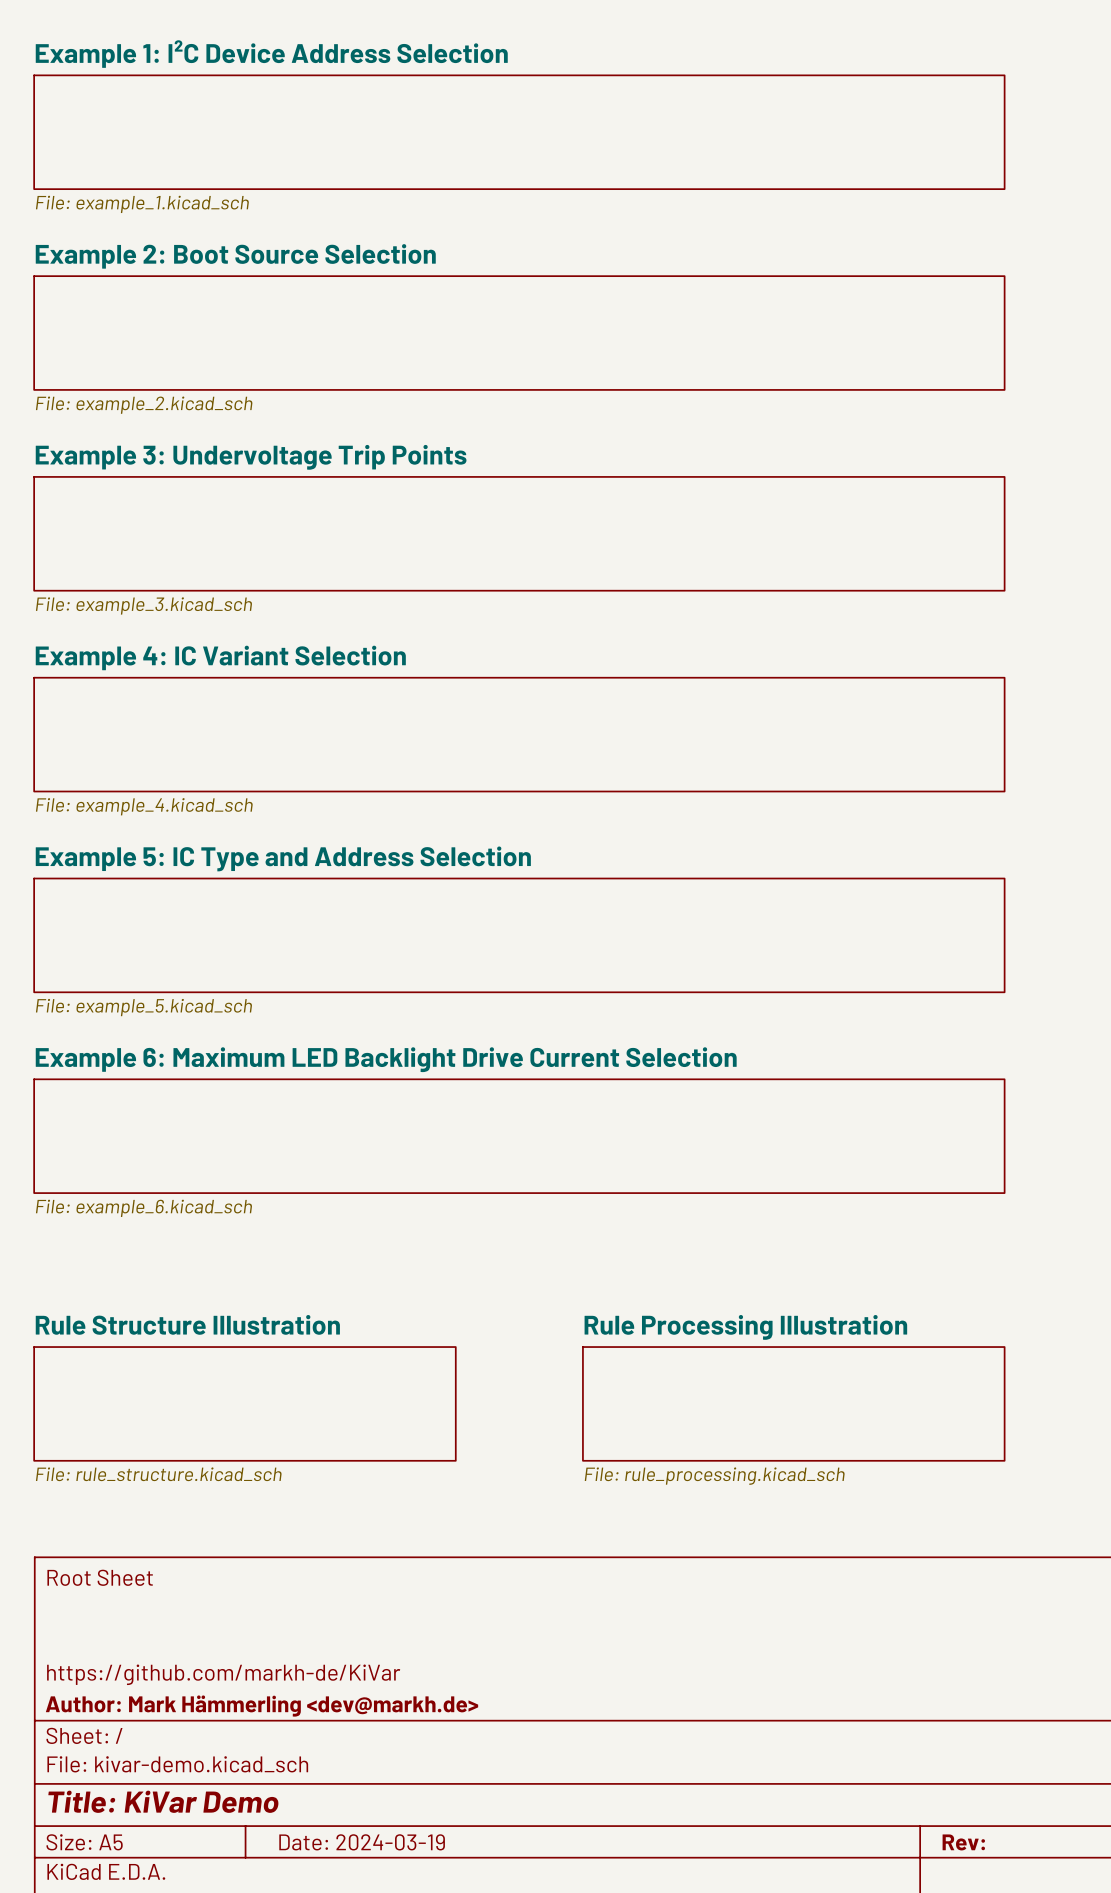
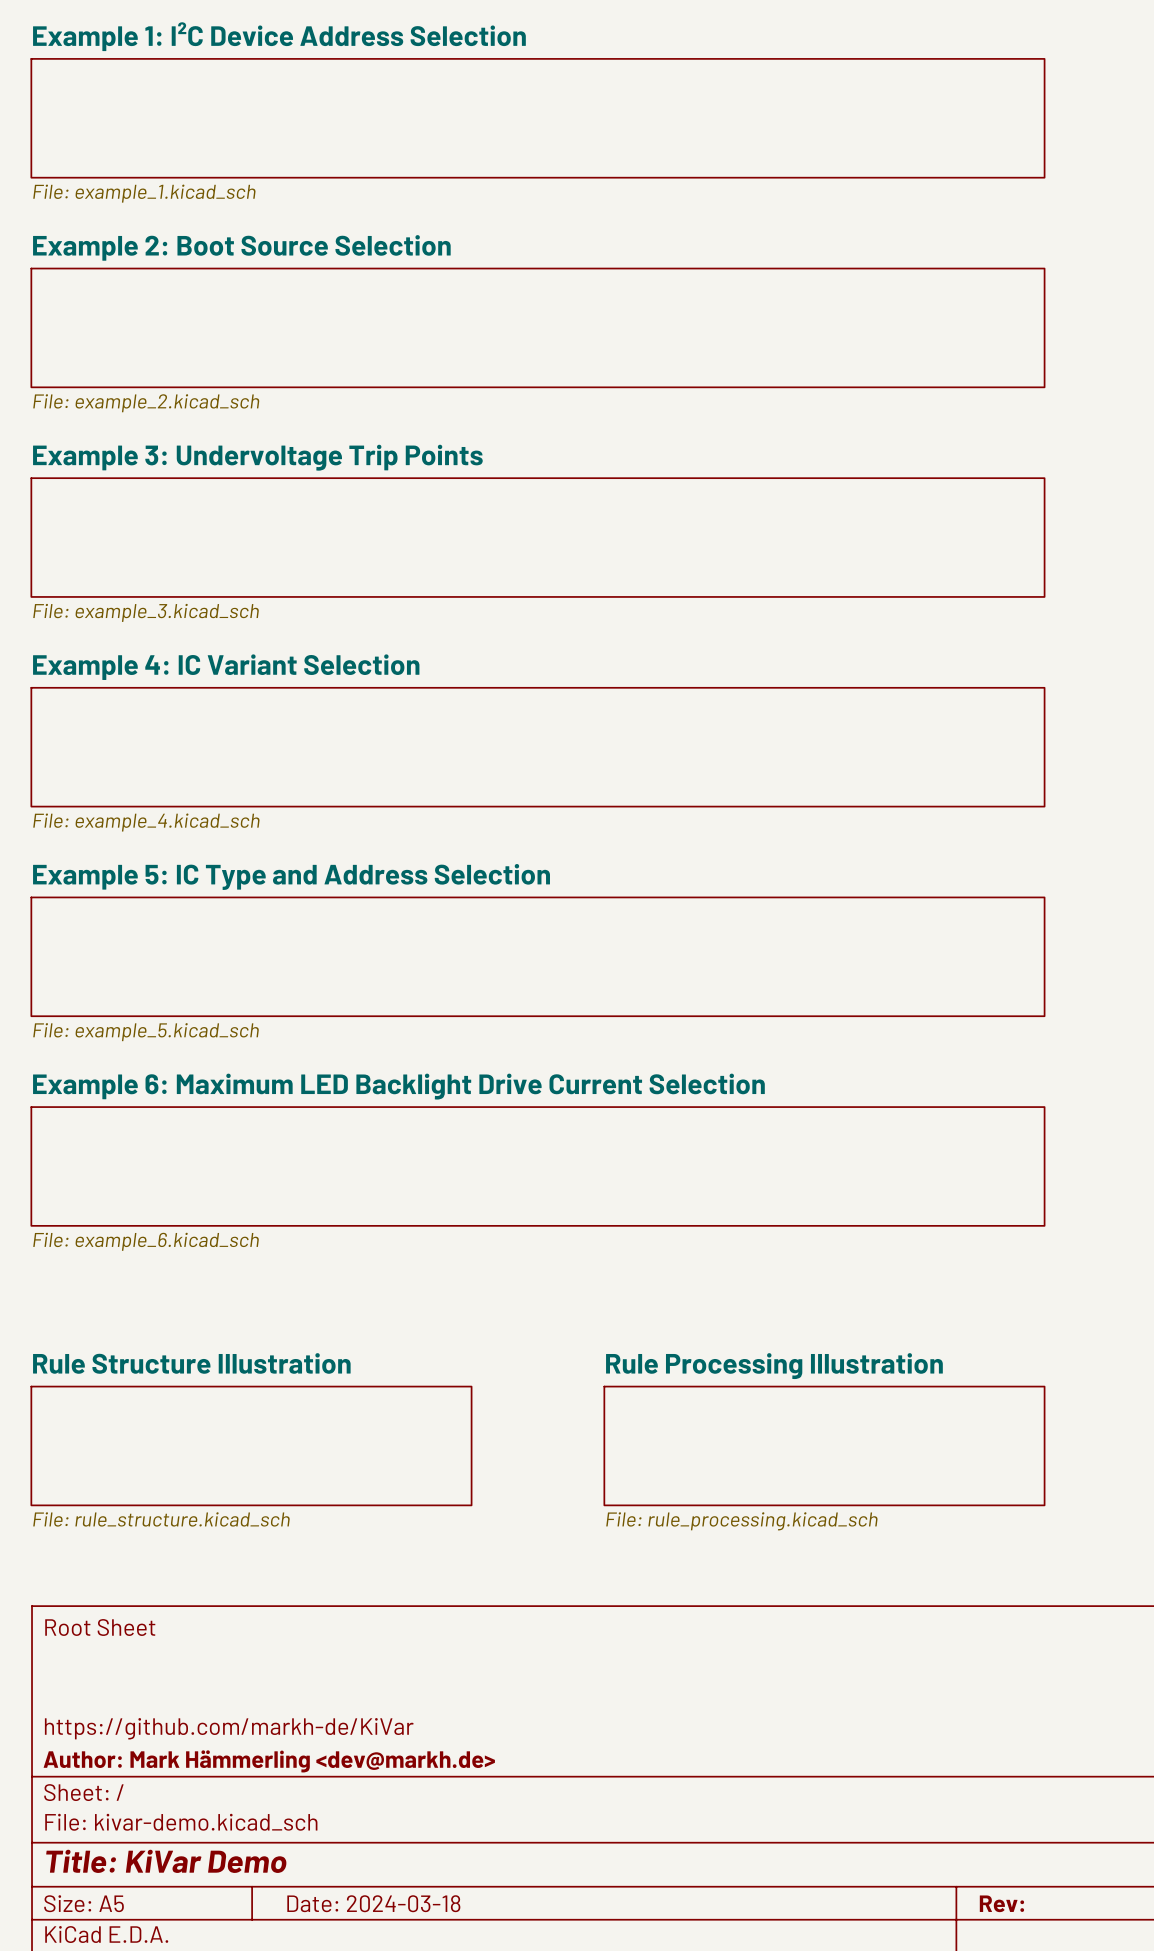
title block: Date: 2024-03-19 (362, 1842) -> Date: 2024-03-18 (373, 1903)

